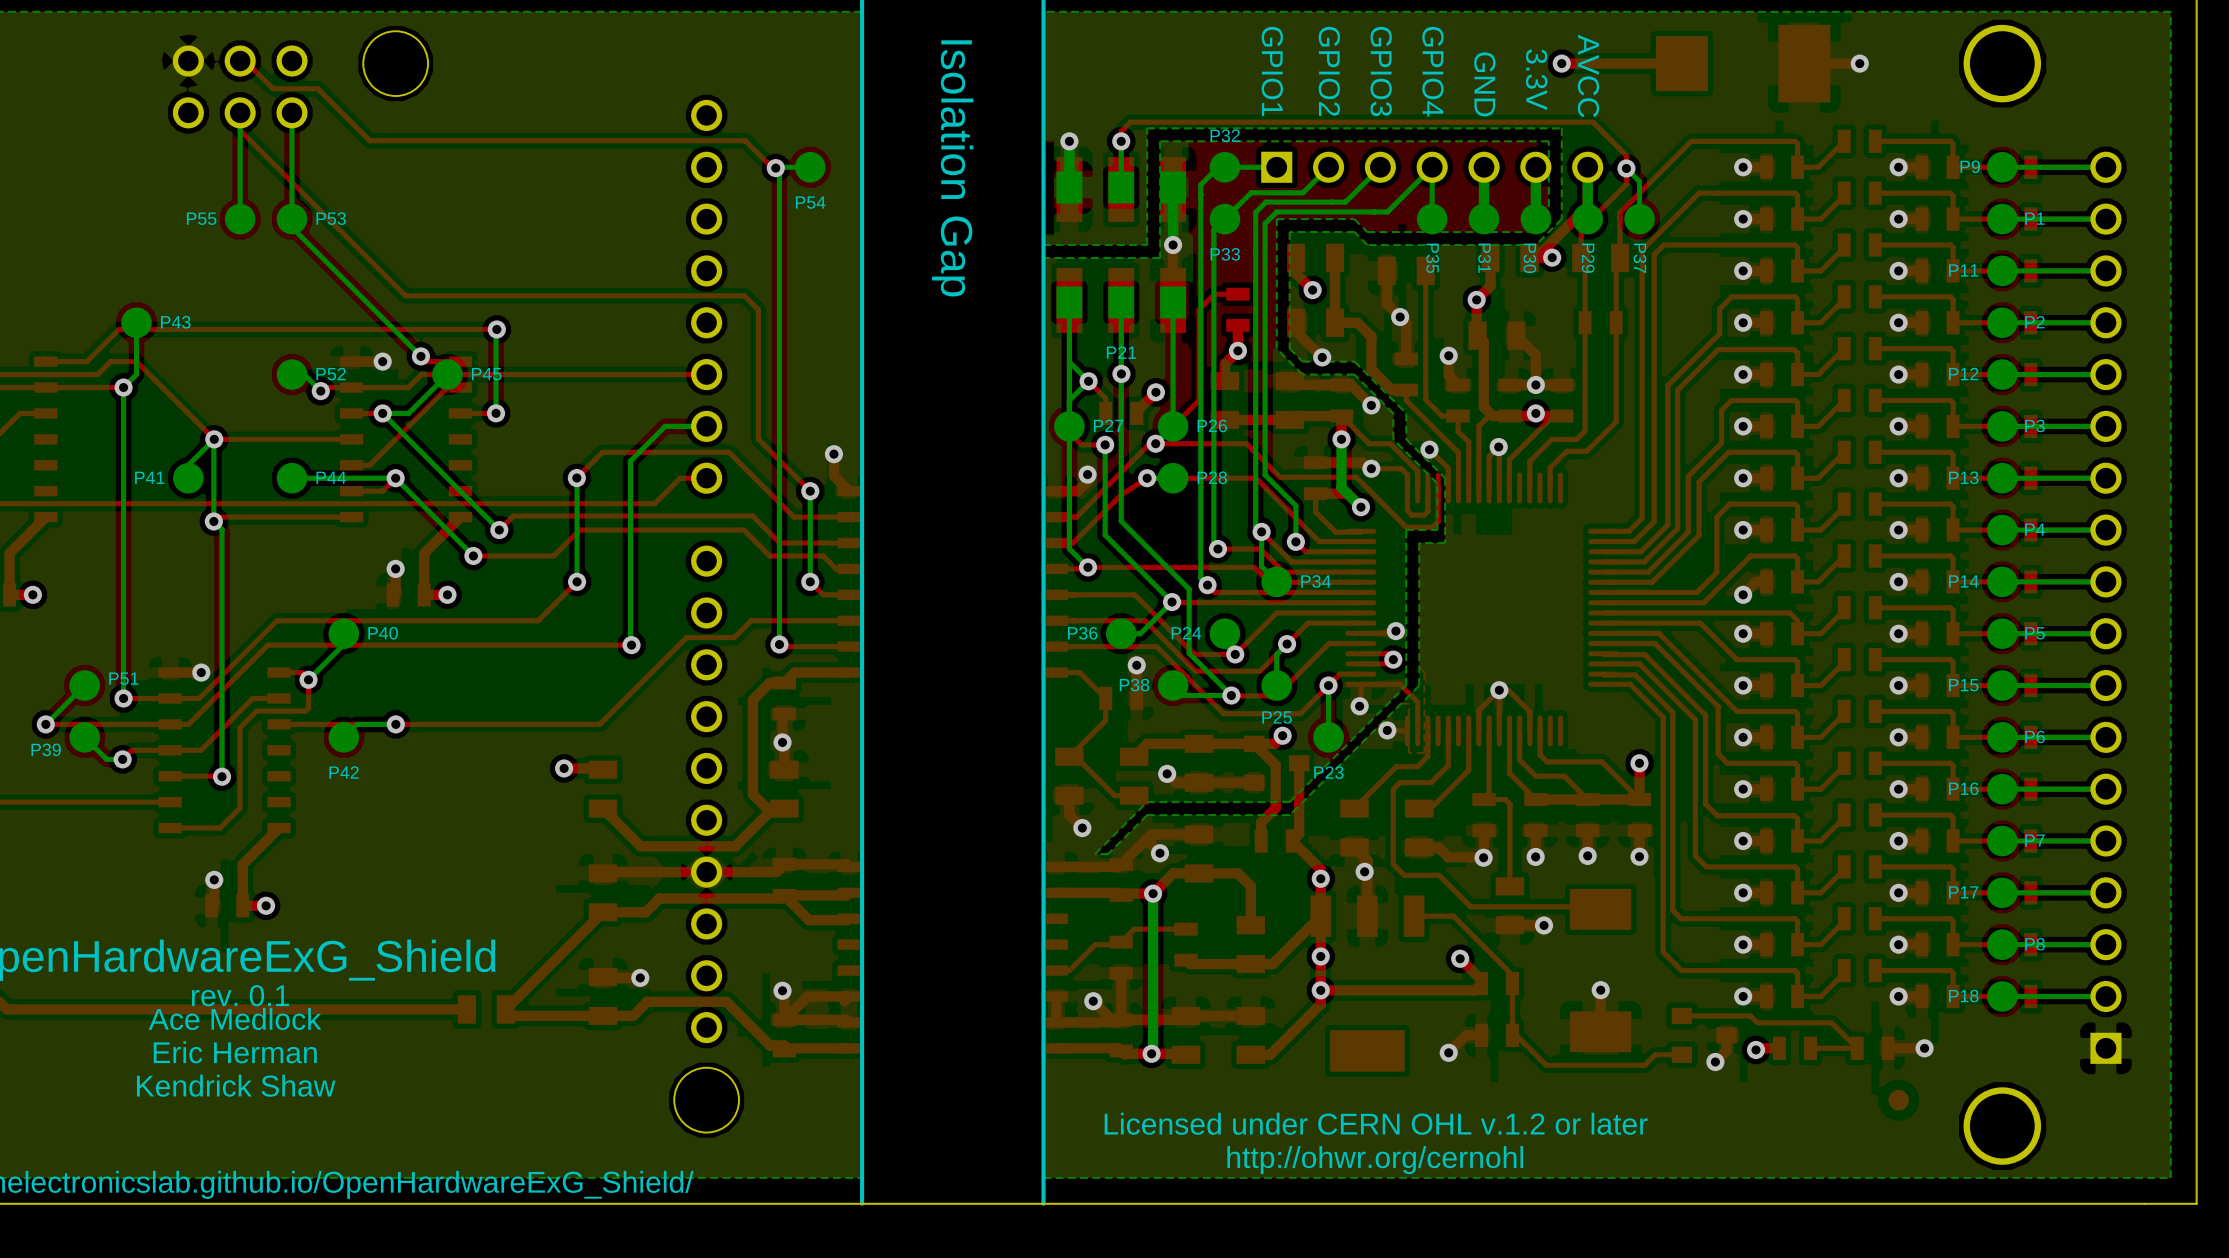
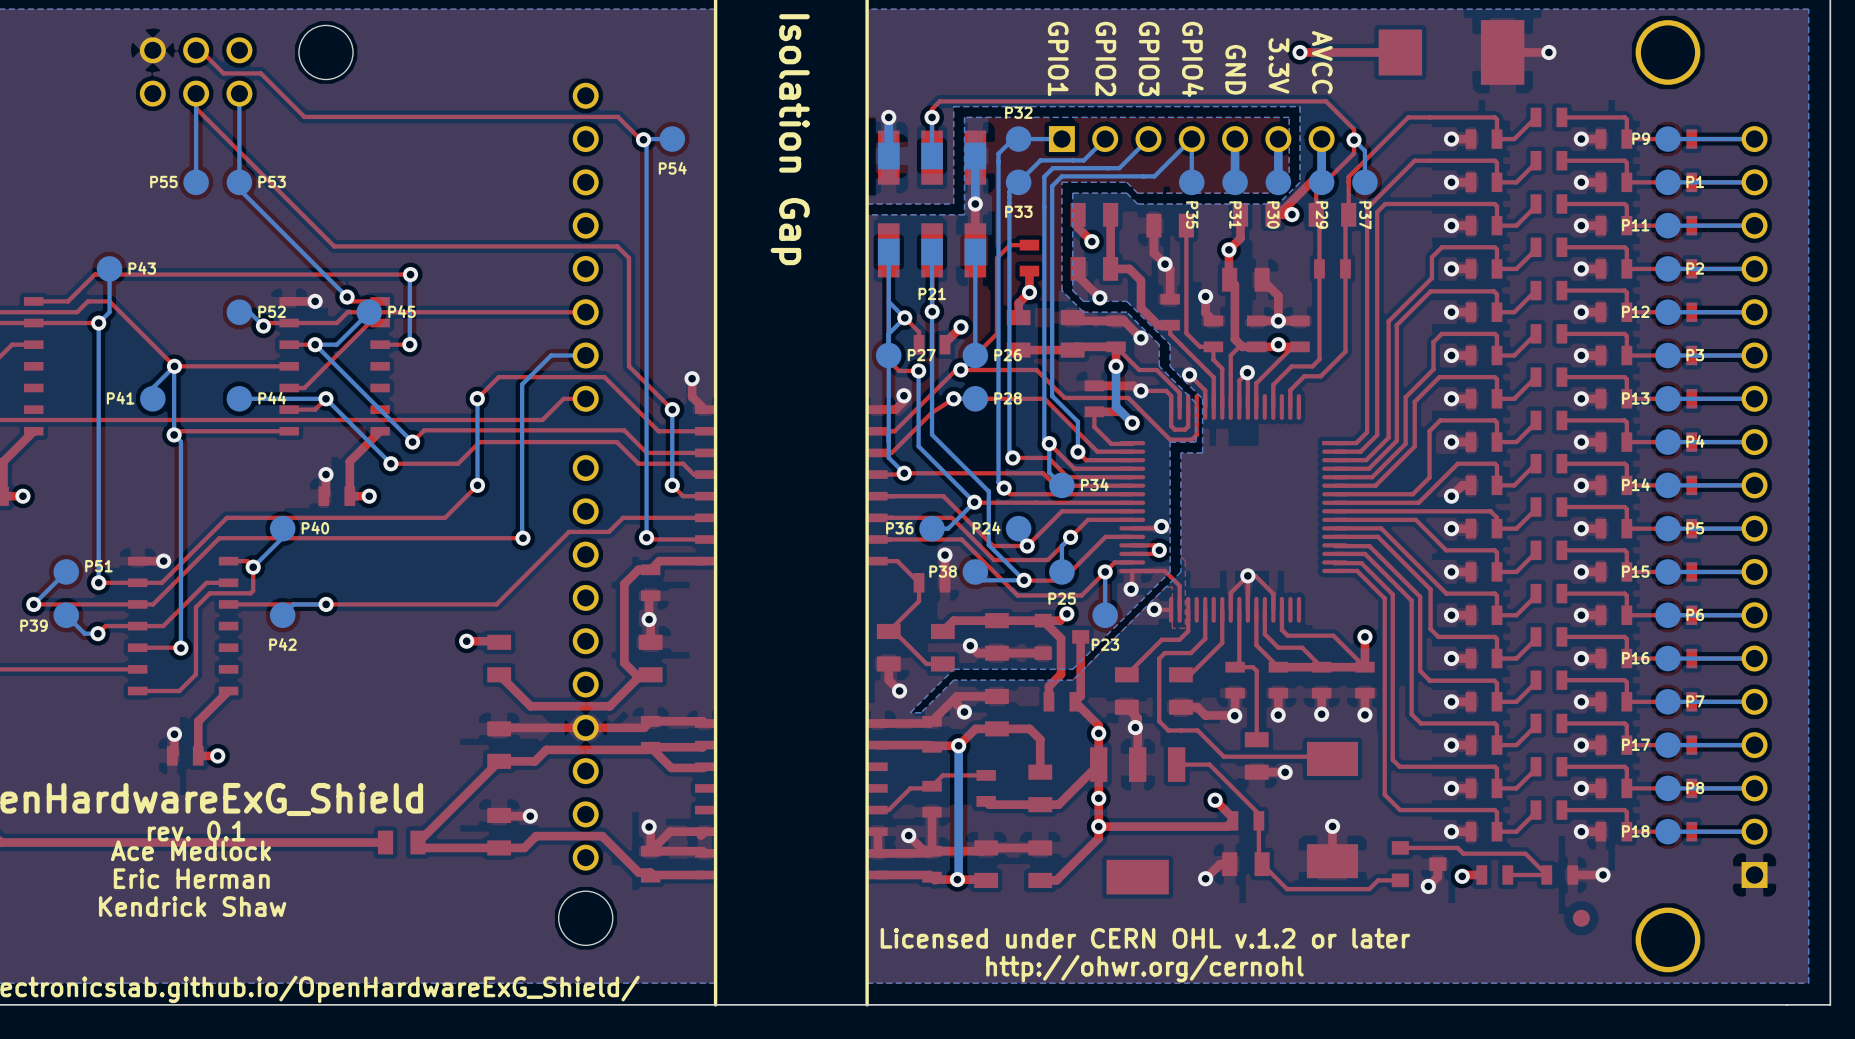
part footprint: [1474, 1023, 1520, 1048] -> [1222, 852, 1270, 877]

